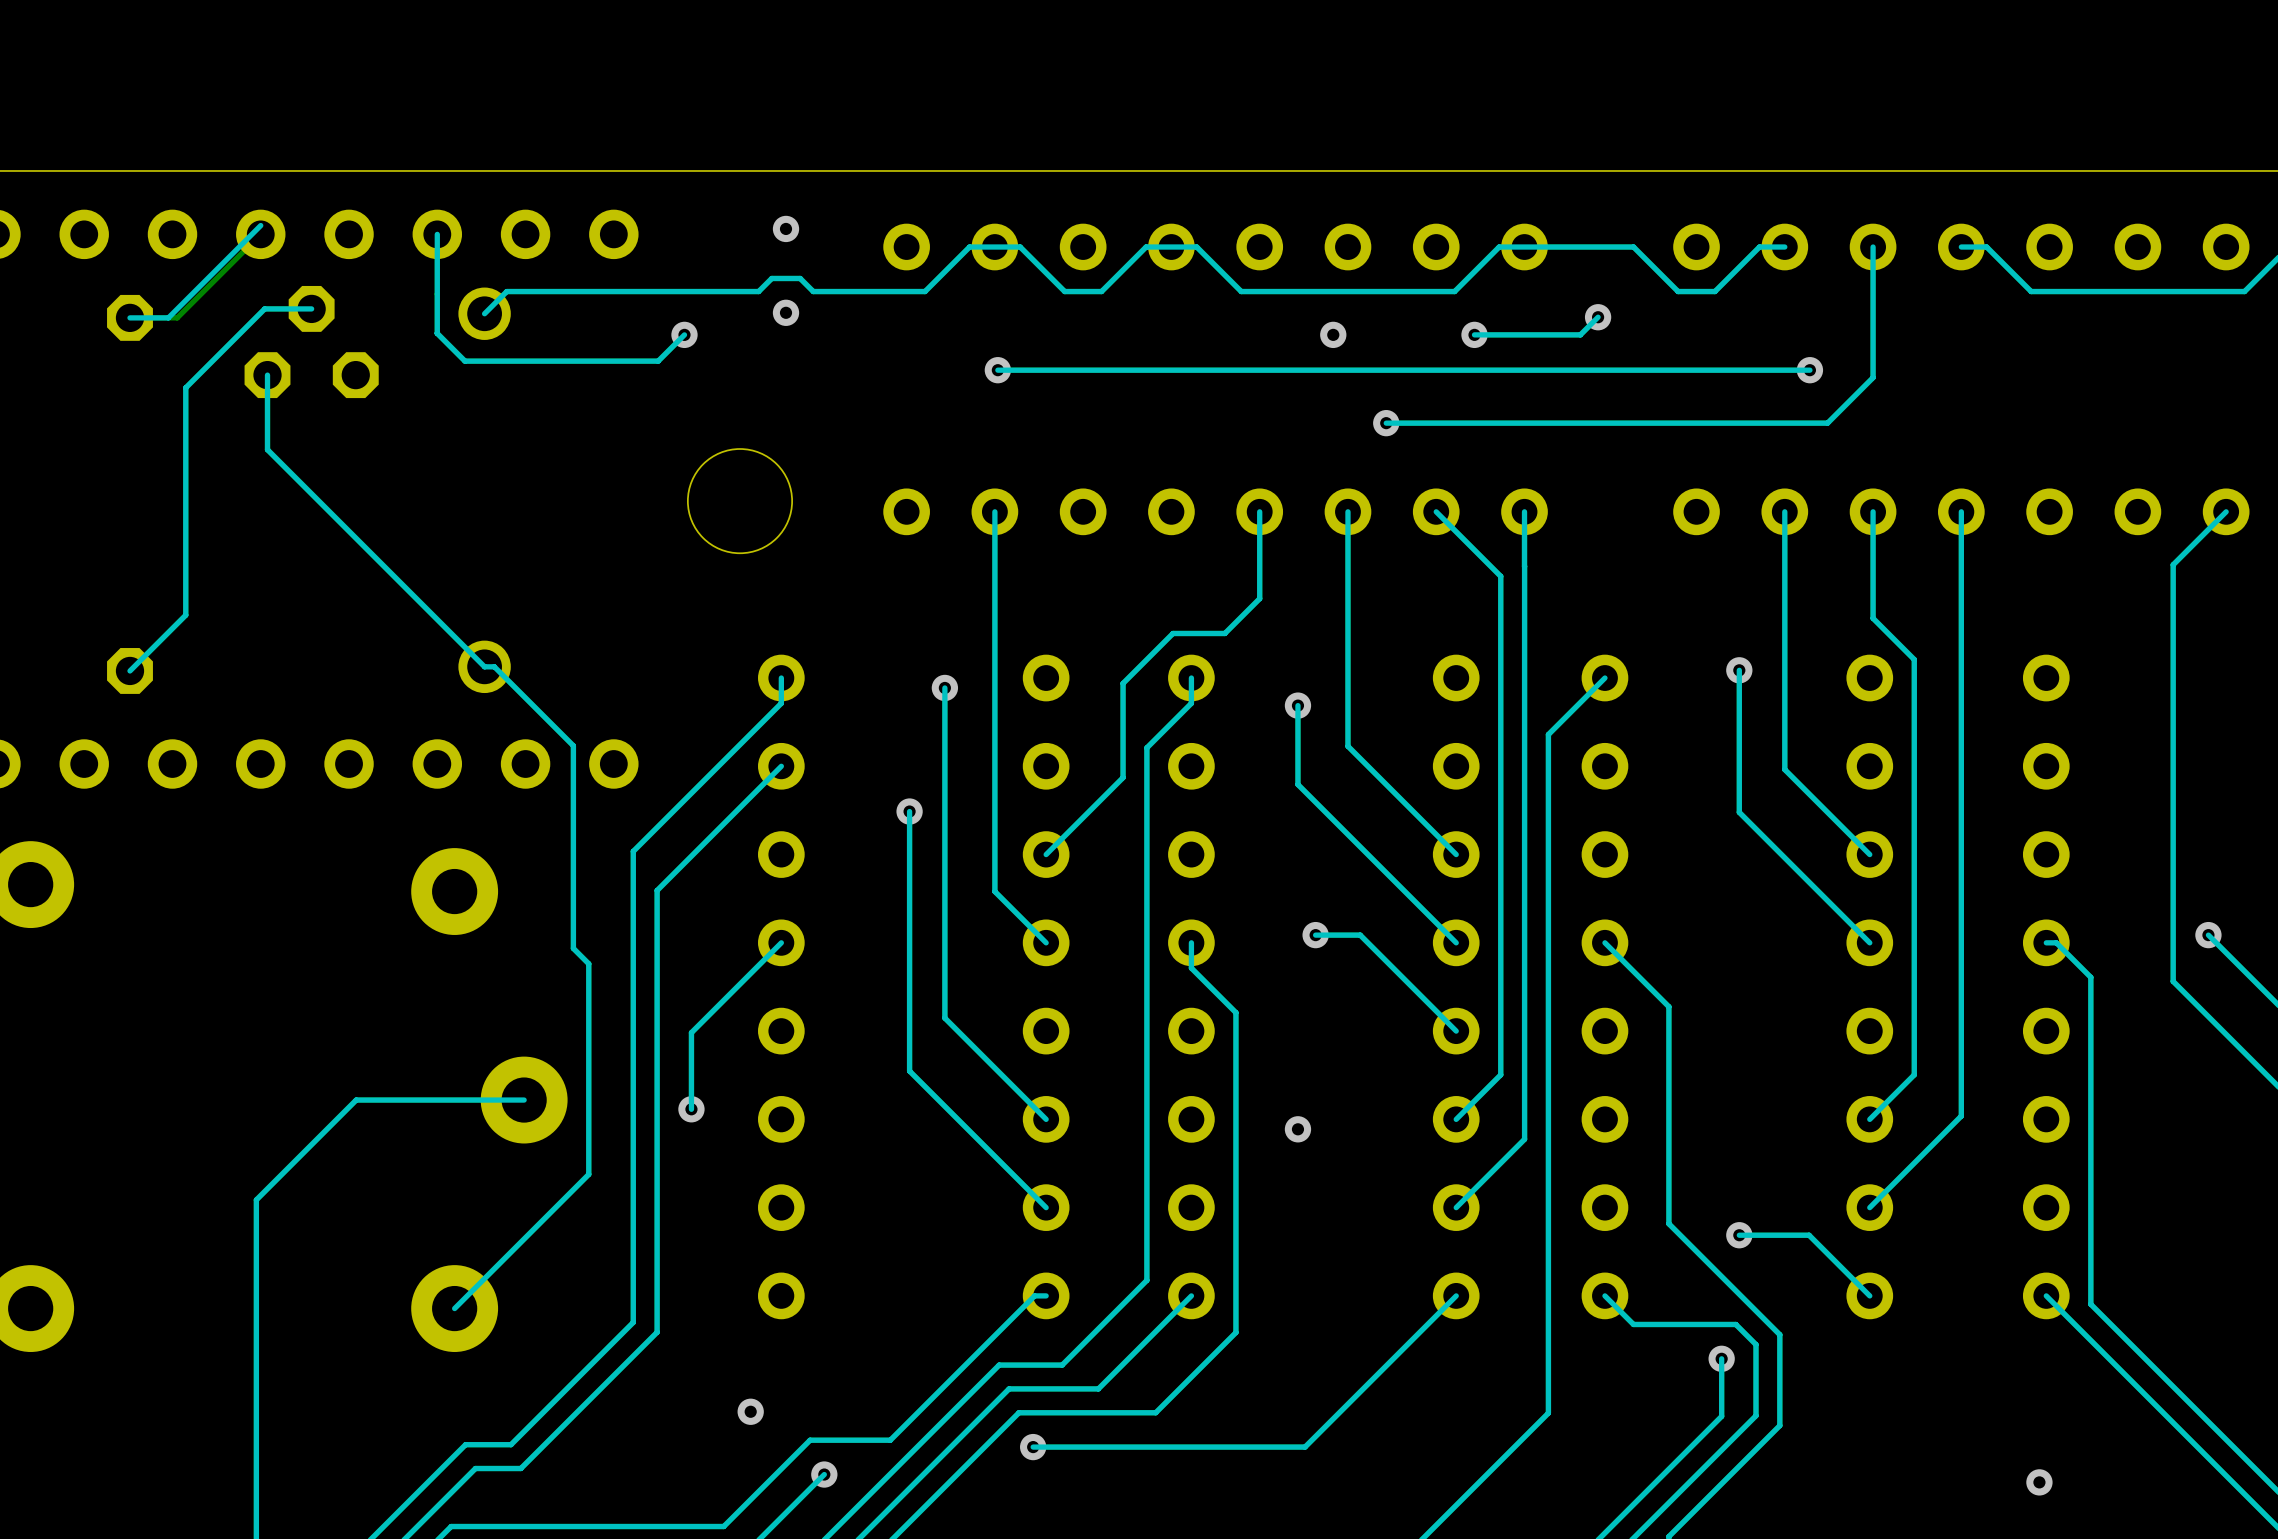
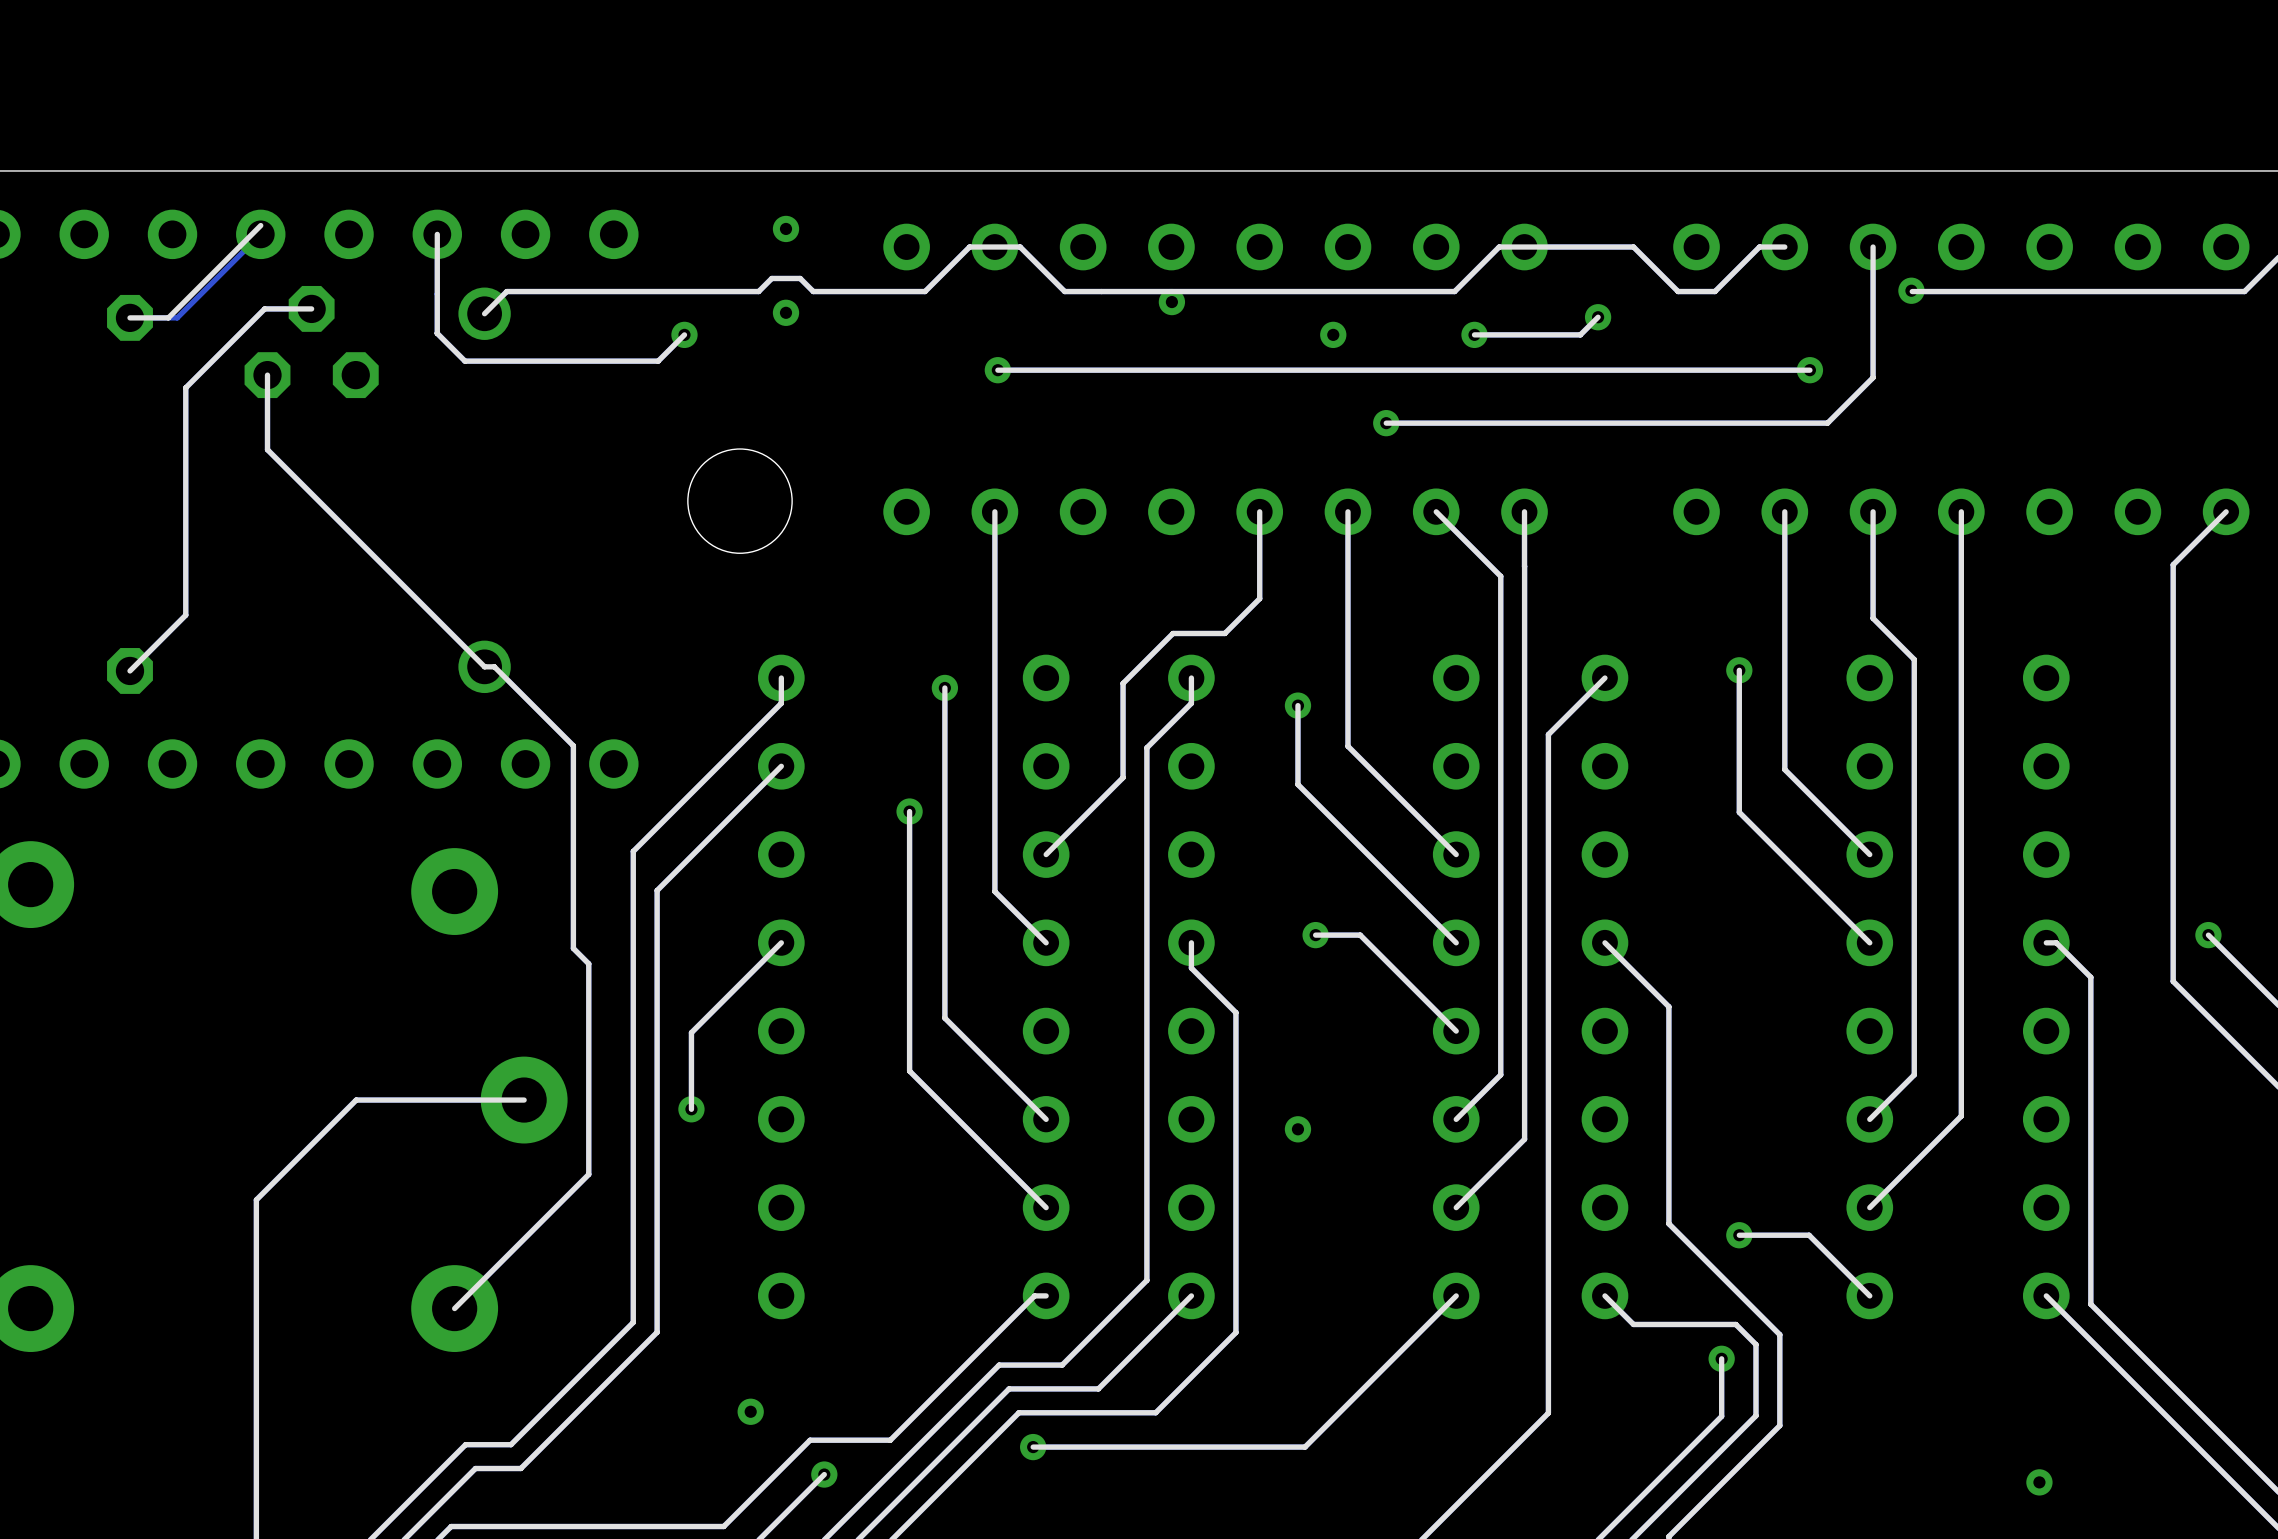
line: (1961, 247) (1986, 247) (2031, 291) -> (1912, 291) (2031, 291)
via: none -> (1911, 290)
line: (1241, 291) (1196, 247) (1146, 247) (1101, 291) -> (1241, 291) (1101, 291)
via: none -> (1171, 302)

